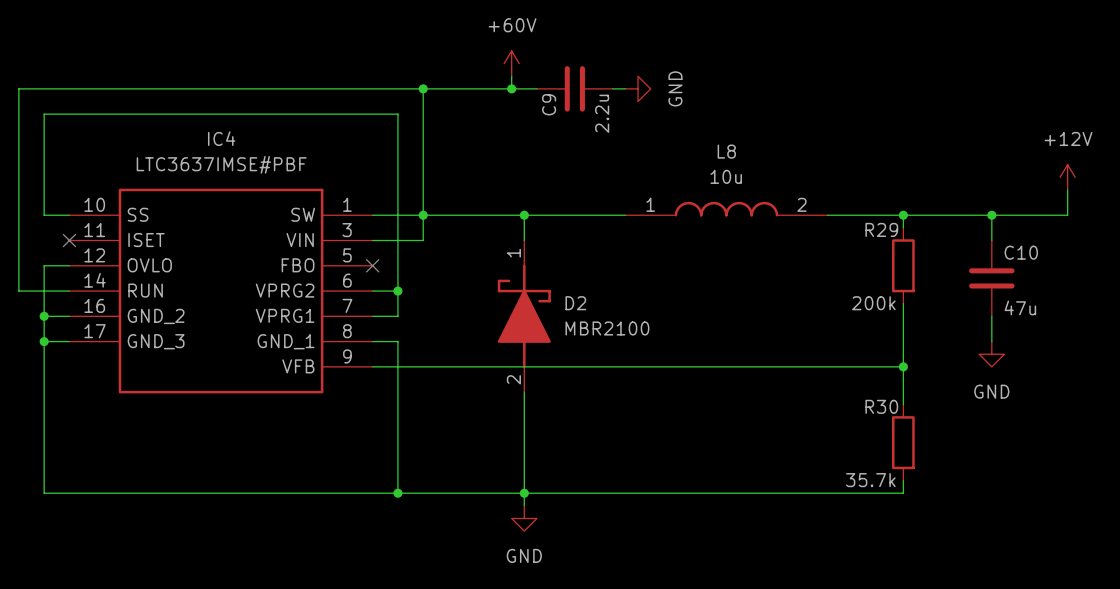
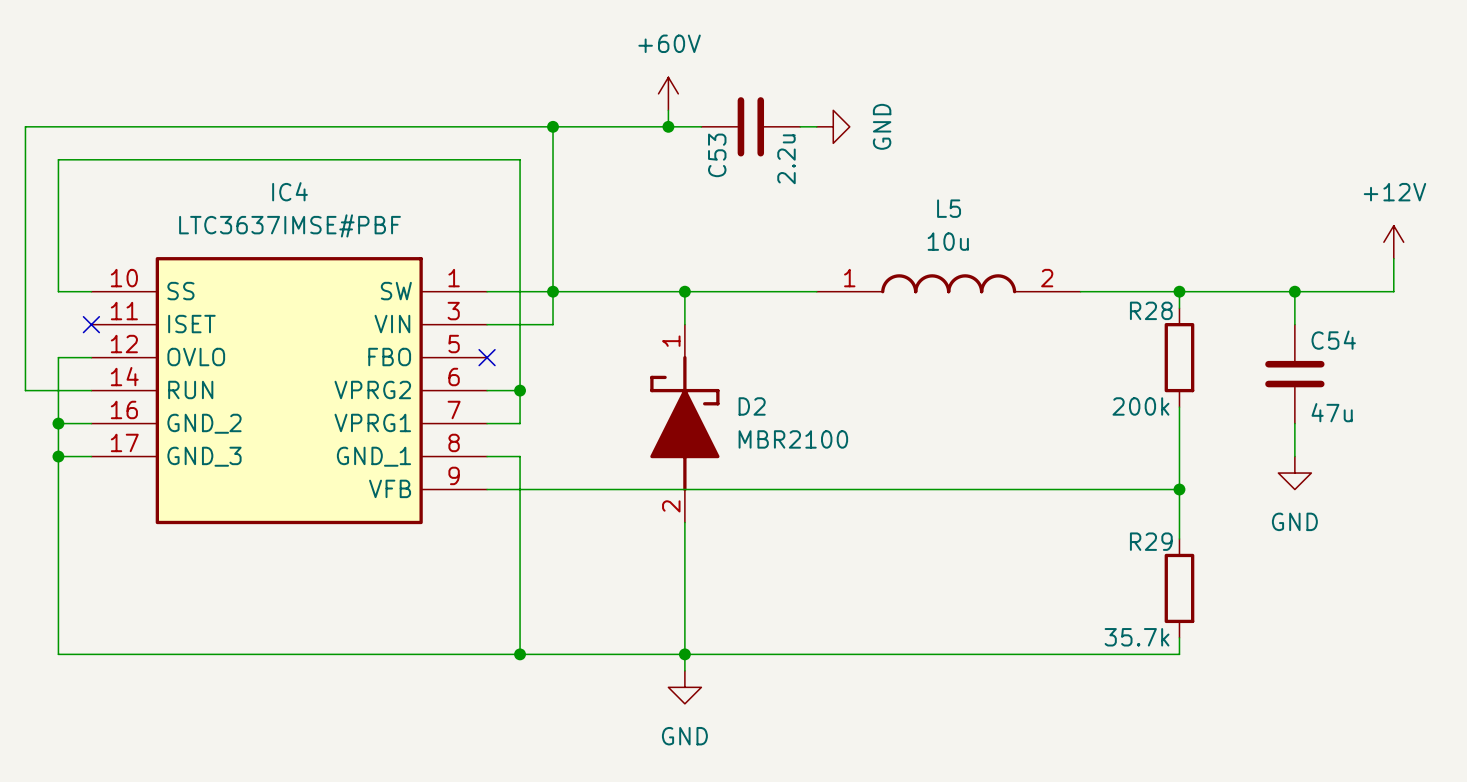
C9 name: C9 (549, 104) -> C53 (717, 155)
L8 name: L8 (726, 151) -> L5 (949, 208)
R29 name: R29 (881, 229) -> R28 (1151, 310)
C10 name: C10 (1021, 252) -> C54 (1333, 340)
R30 name: R30 (881, 406) -> R29 (1151, 541)

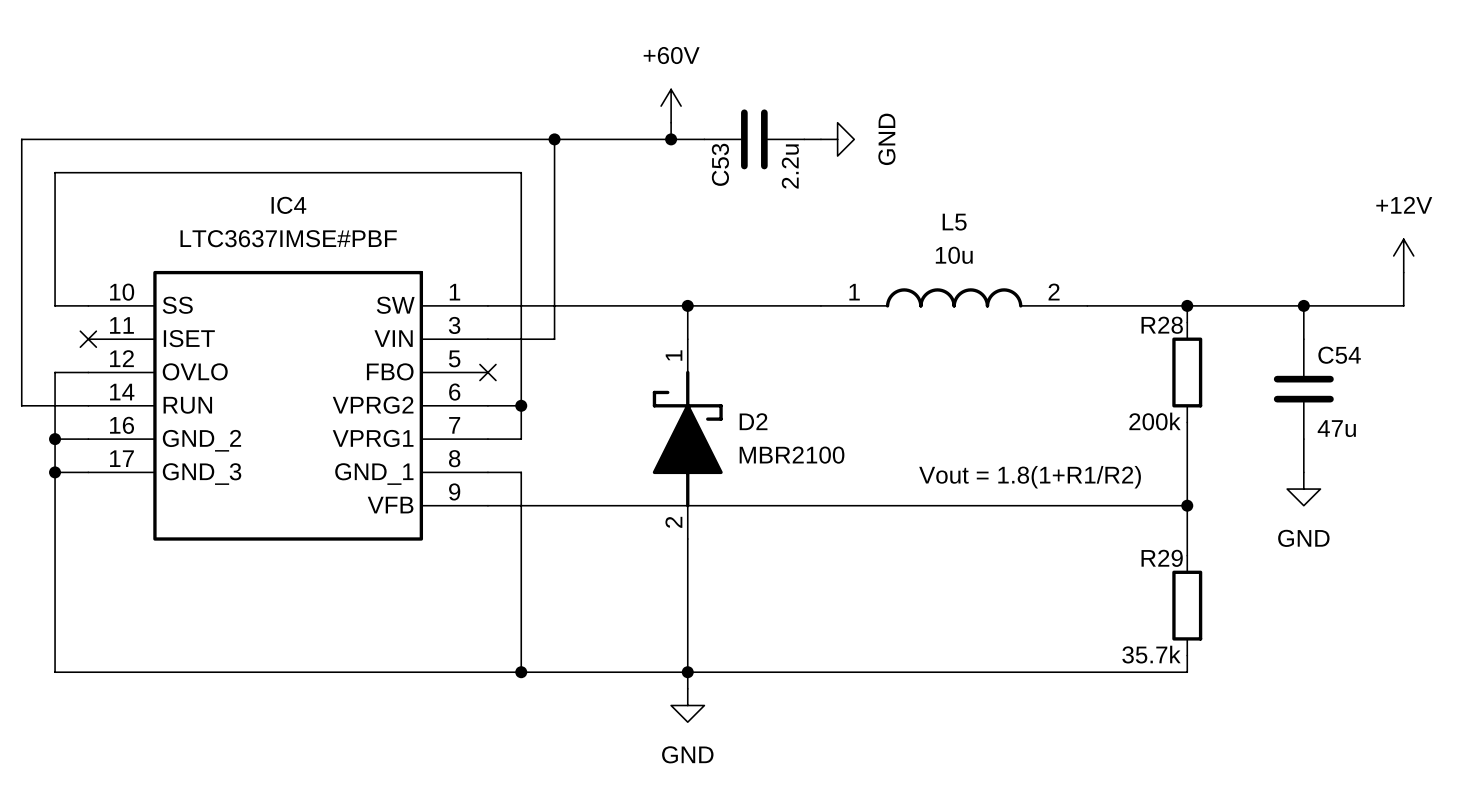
junction: (553, 291) -> none
text: none -> Vout = 1.8(1+R1/R2) (1030, 477)

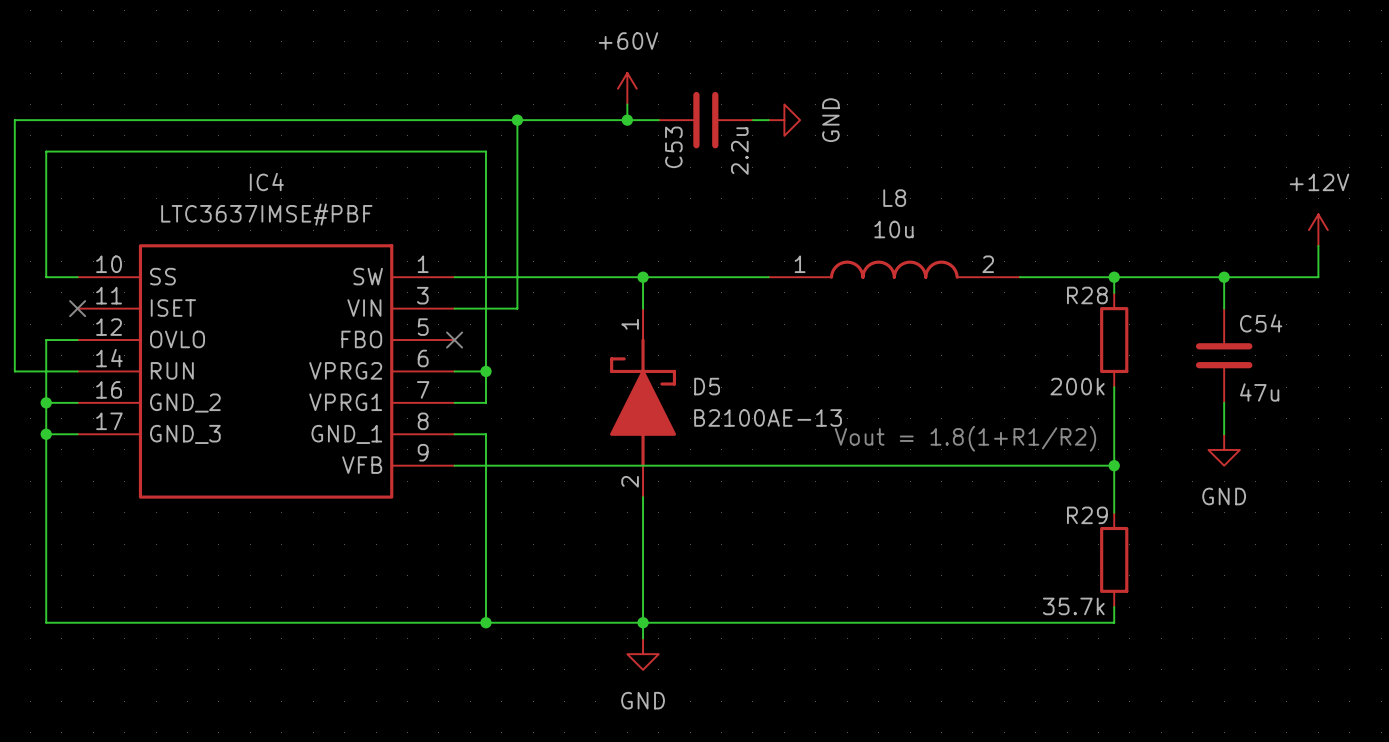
L5 name: L5 (954, 222) -> L8 (894, 198)
D2 name: D2 (753, 421) -> D5 (707, 386)
D2 value: MBR2100 (792, 455) -> B2100AE-13 (768, 417)

